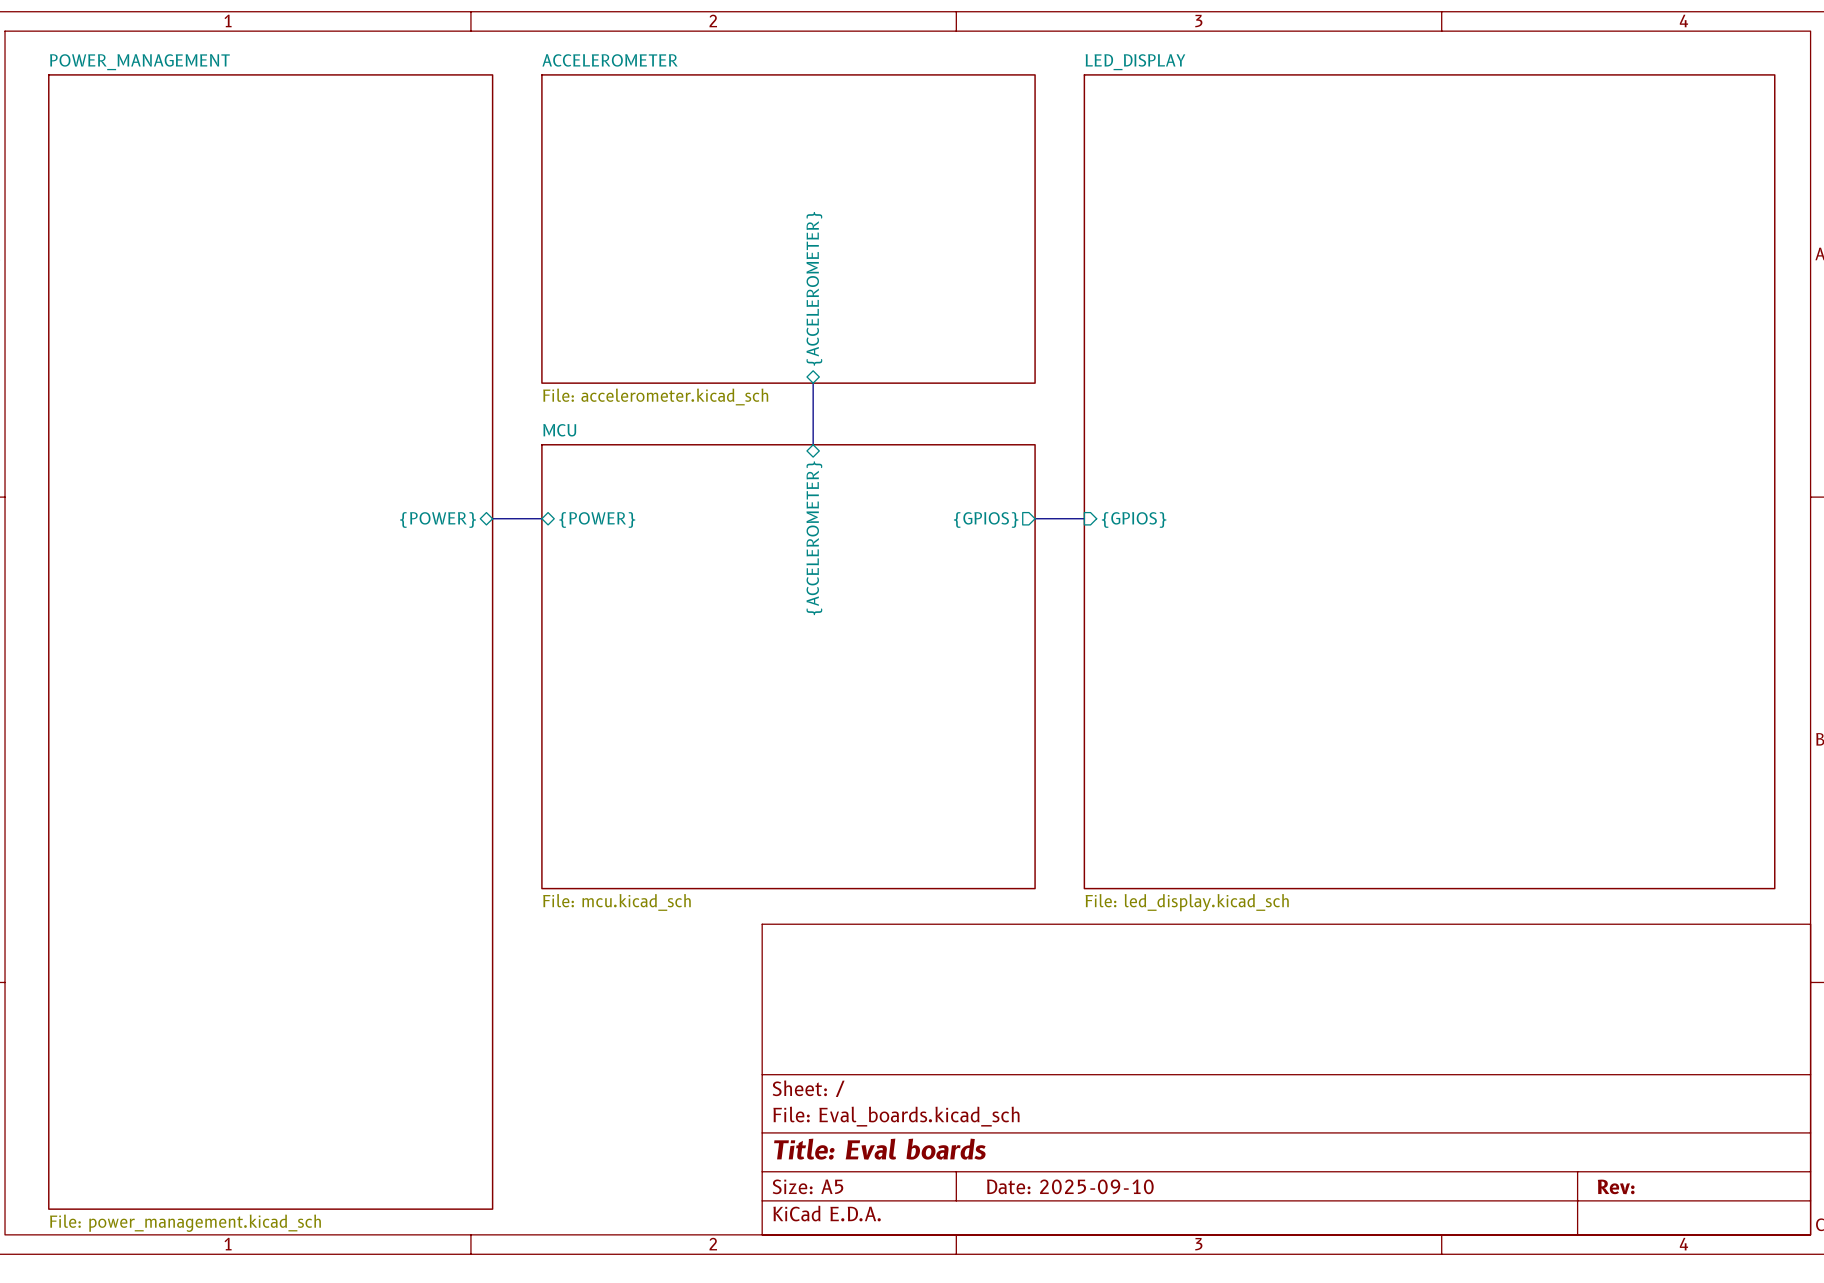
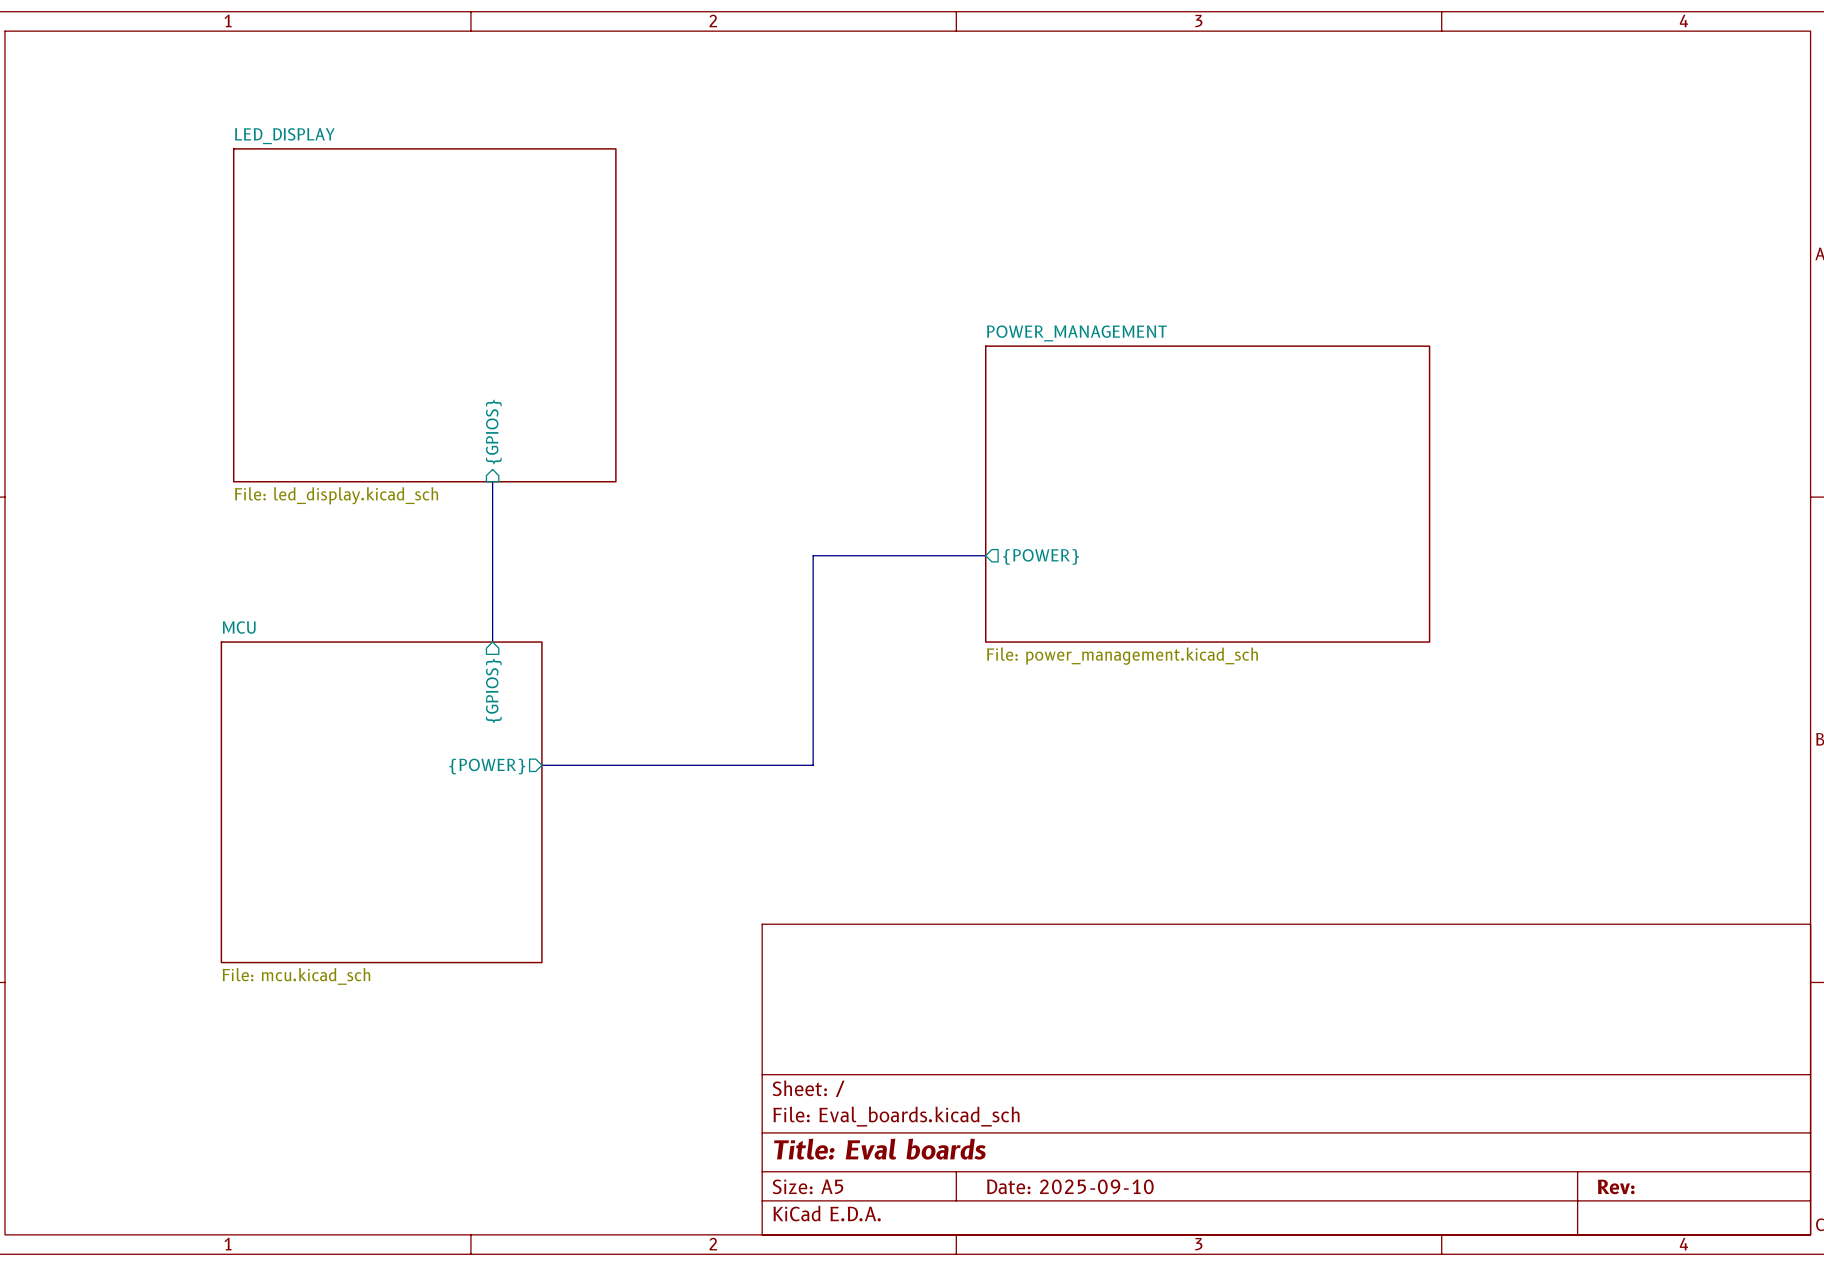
sheet ACCELEROMETER: File: accelerometer.kicad_sch (788, 229) -> none
sheet pin: {ACCELEROMETER} (814, 288) -> none
sheet LED_DISPLAY: none -> File: led_display.kicad_sch (424, 315)
bus: (813, 383) (813, 444) -> none
sheet pin: none -> {GPIOS} (493, 432)
bus: none -> (492, 481) (492, 642)
sheet LED_DISPLAY: File: led_display.kicad_sch (1429, 481) -> none
sheet POWER_MANAGEMENT: none -> File: power_management.kicad_sch (1207, 494)
bus: (492, 518) (541, 518) -> none
bus: (1035, 518) (1084, 518) -> none
sheet pin: {POWER} (438, 519) -> none
sheet pin: {POWER} (597, 519) -> none
sheet pin: {GPIOS} (986, 519) -> none
sheet pin: {GPIOS} (1134, 519) -> none
sheet pin: {ACCELEROMETER} (814, 538) -> none
bus: none -> (985, 555) (813, 555) (813, 765) (541, 765)
sheet pin: none -> {POWER} (1041, 556)
sheet POWER_MANAGEMENT: File: power_management.kicad_sch (270, 642) -> none
sheet MCU: File: mcu.kicad_sch (788, 666) -> none
sheet pin: none -> {GPIOS} (493, 690)
sheet pin: none -> {POWER} (487, 766)
sheet MCU: none -> File: mcu.kicad_sch (381, 802)

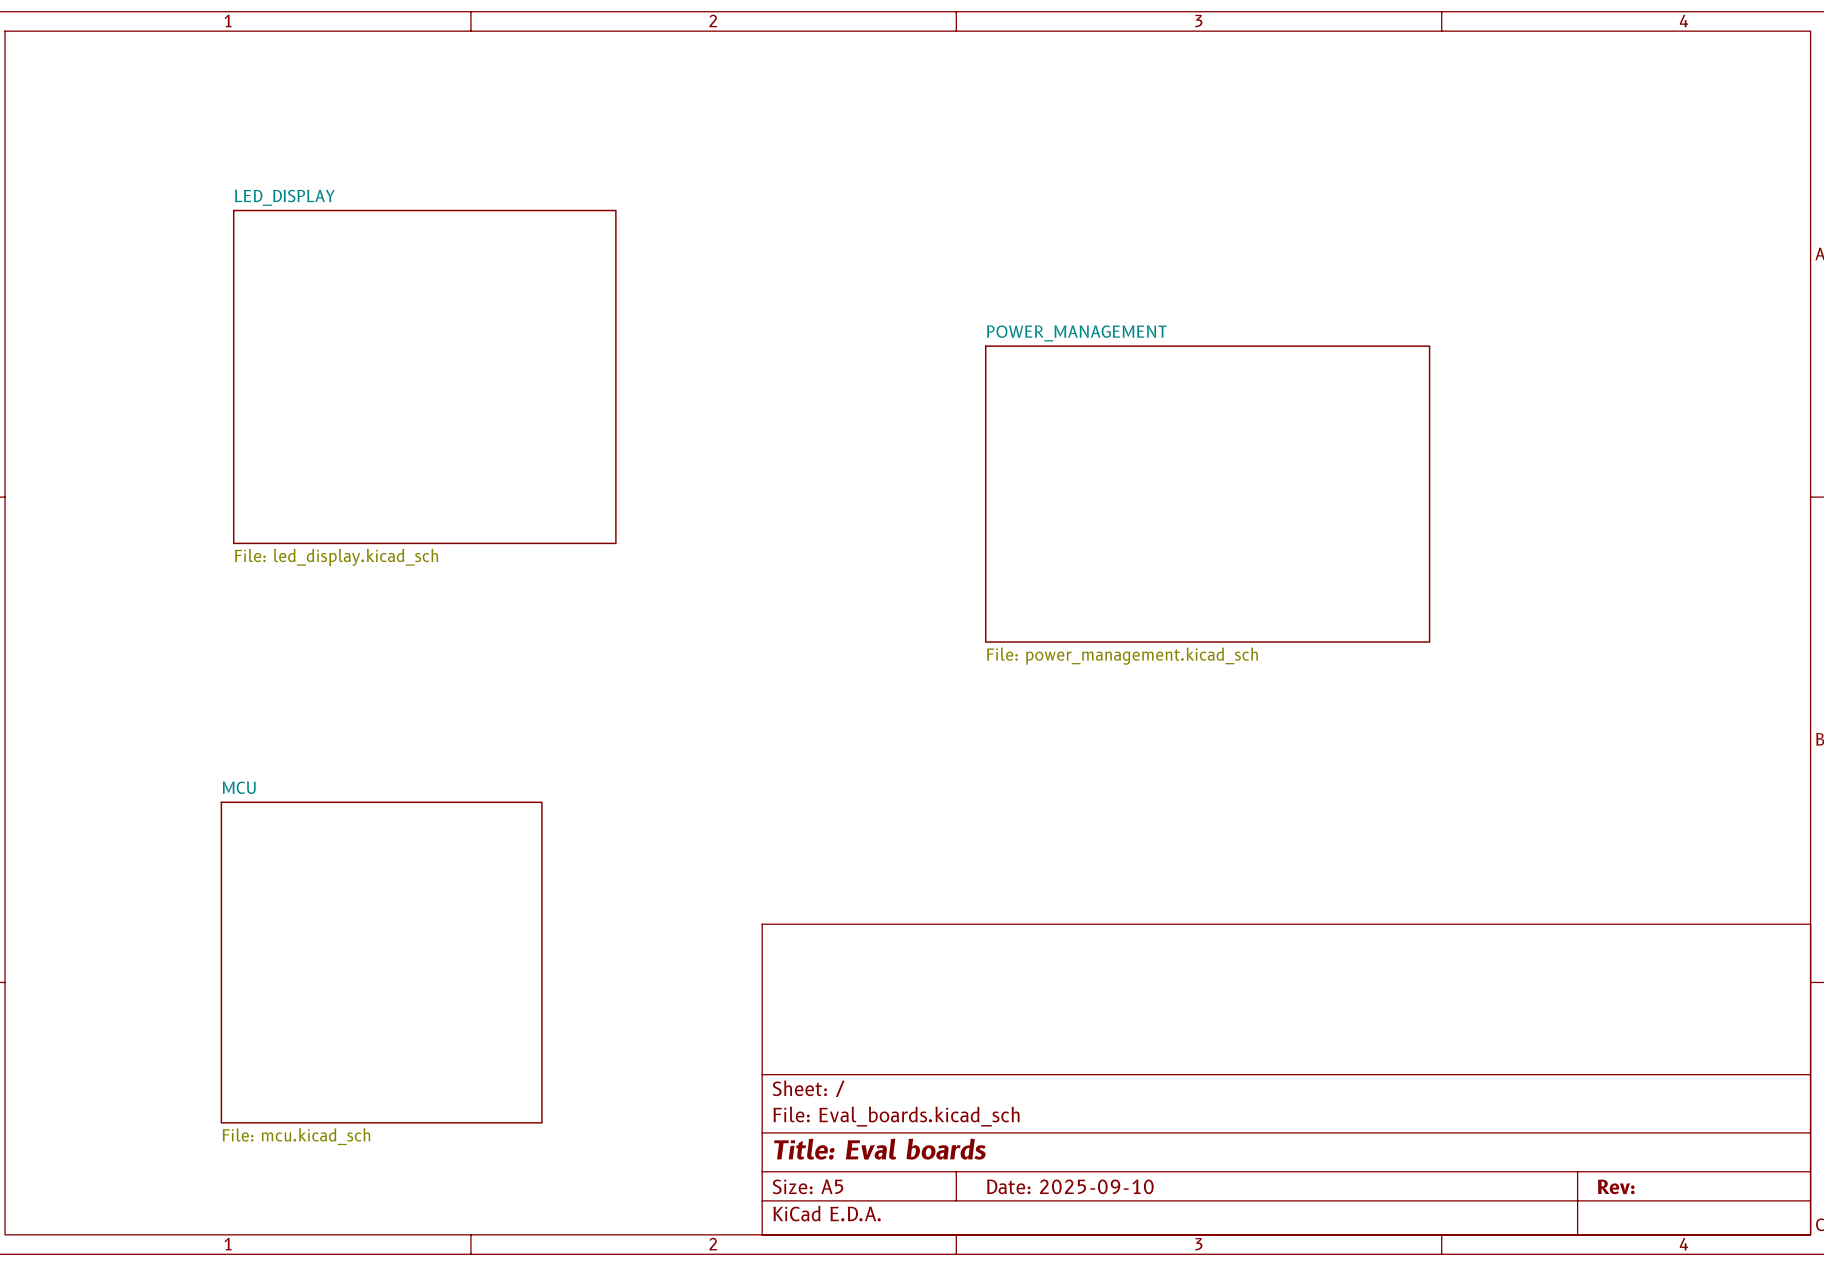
sheet LED_DISPLAY position: (424, 315) -> (424, 376)
sheet pin: {GPIOS} (493, 432) -> none
bus: (492, 481) (492, 642) -> none
bus: (985, 555) (813, 555) (813, 765) (541, 765) -> none
sheet pin: {POWER} (1041, 556) -> none
sheet pin: {GPIOS} (493, 690) -> none
sheet pin: {POWER} (487, 766) -> none
sheet MCU position: (381, 802) -> (381, 962)

